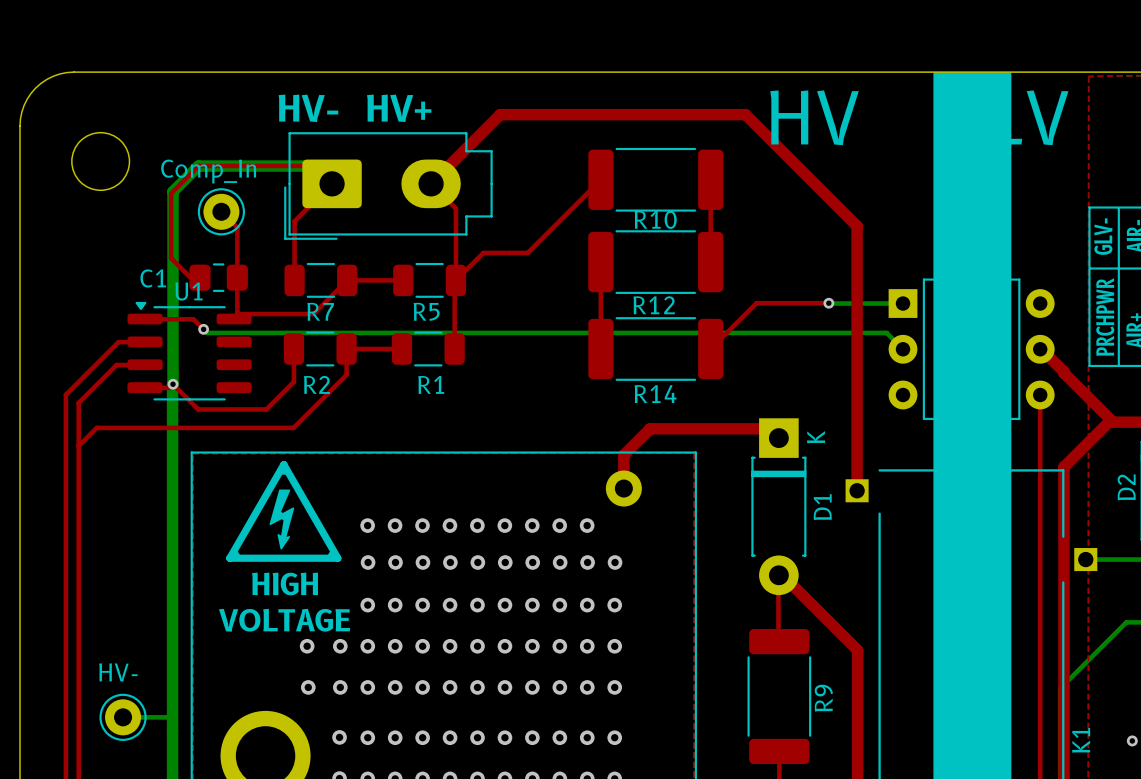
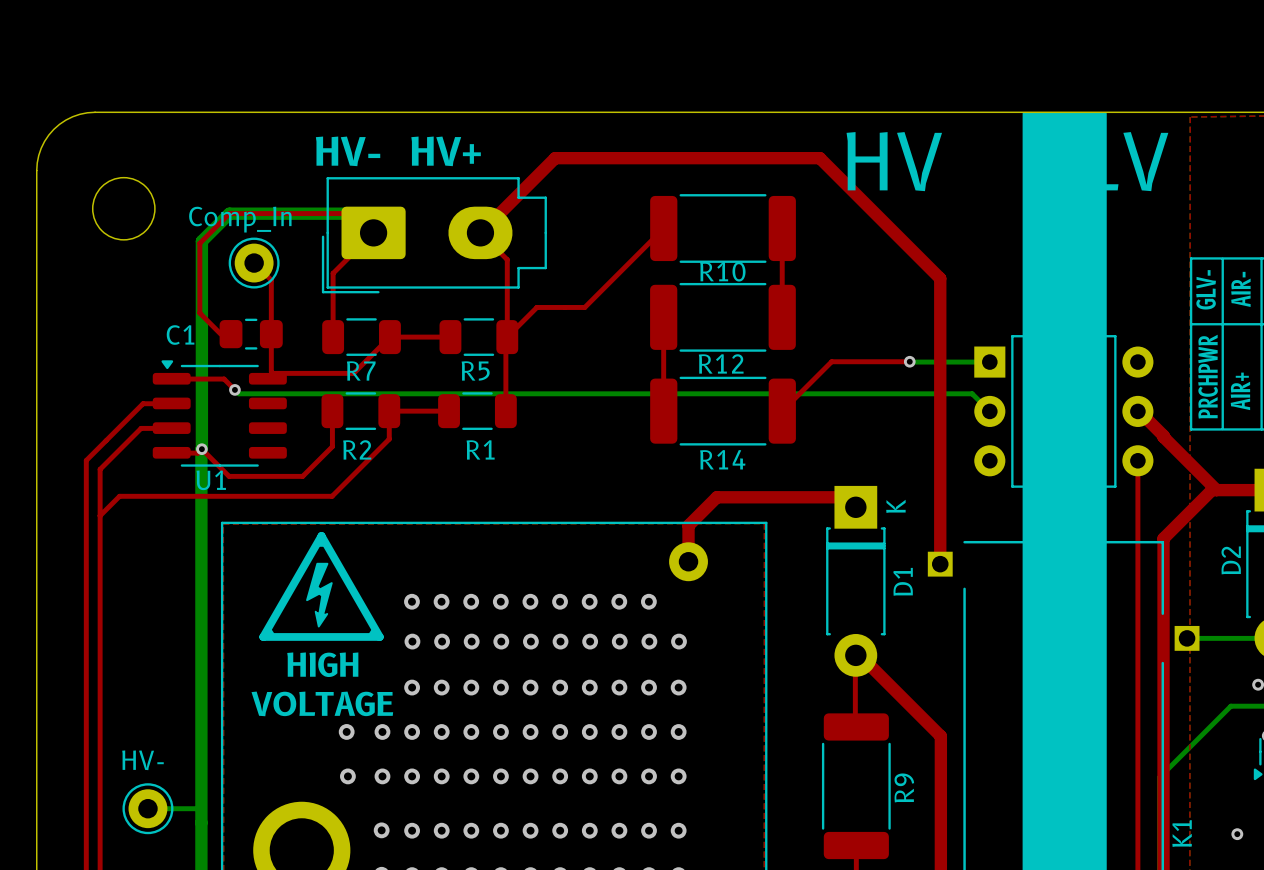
U1 name position: U1 (188, 291) -> U1 (211, 480)

